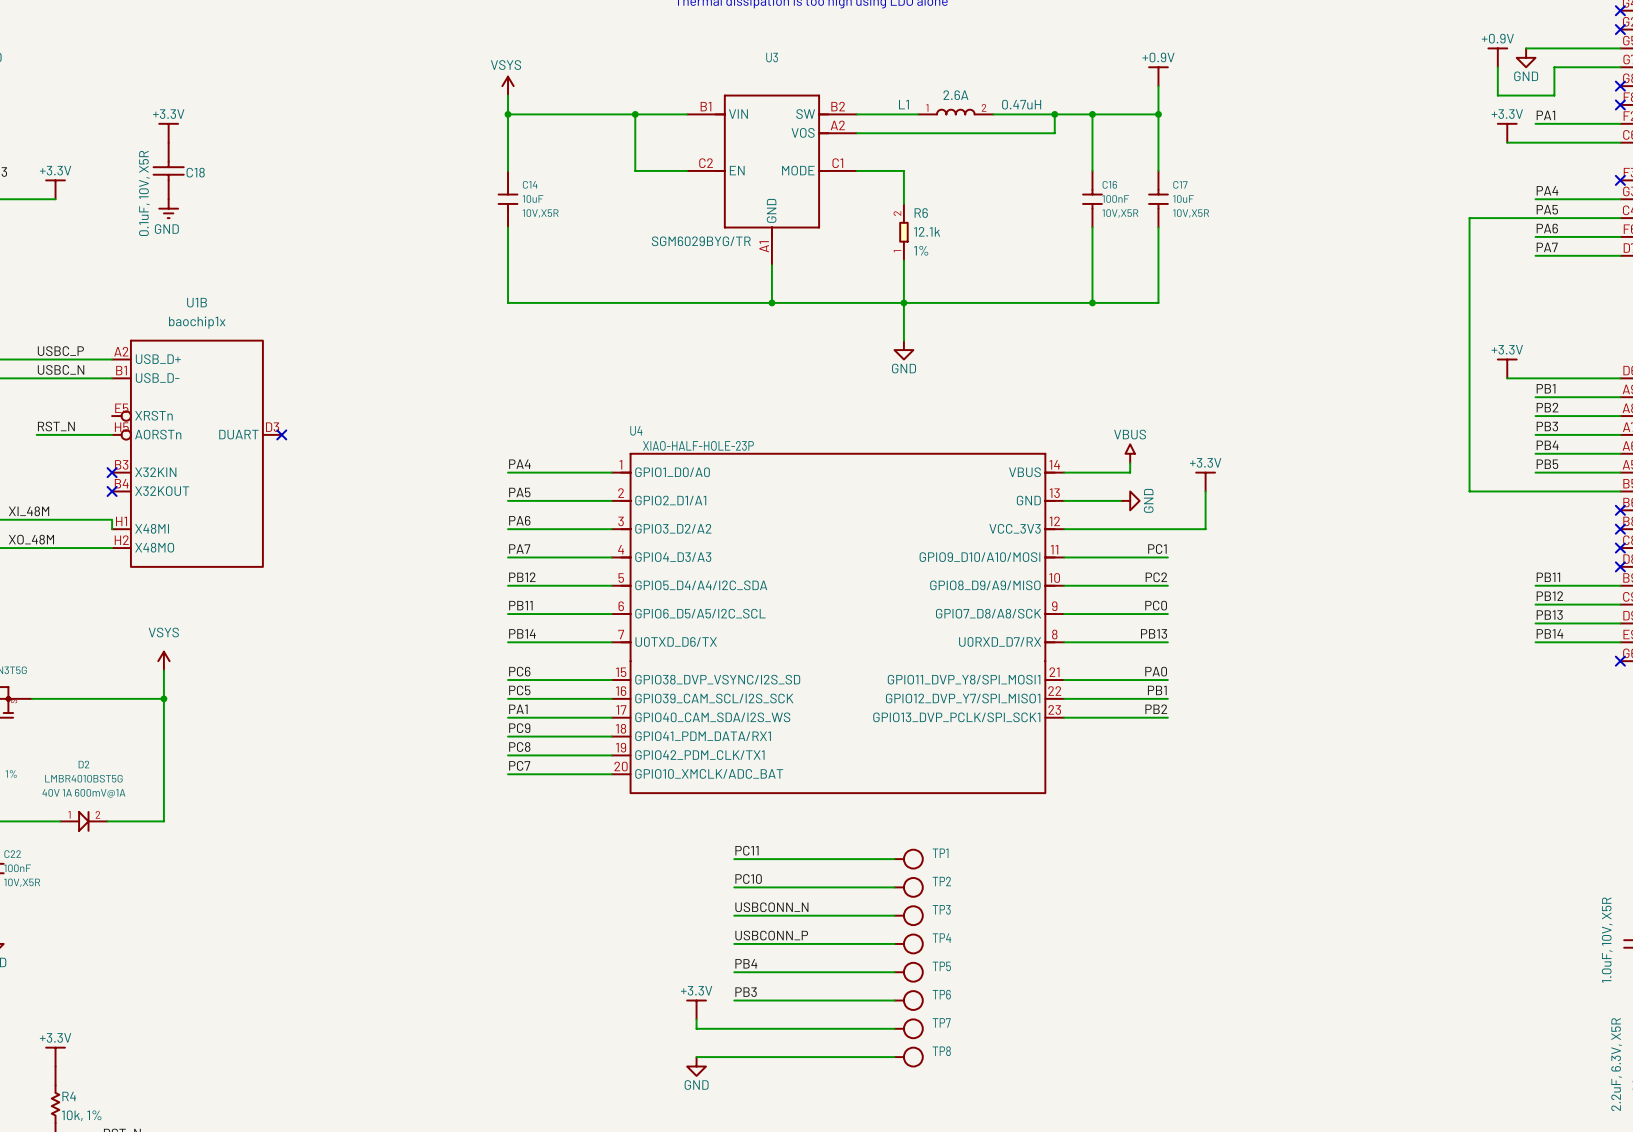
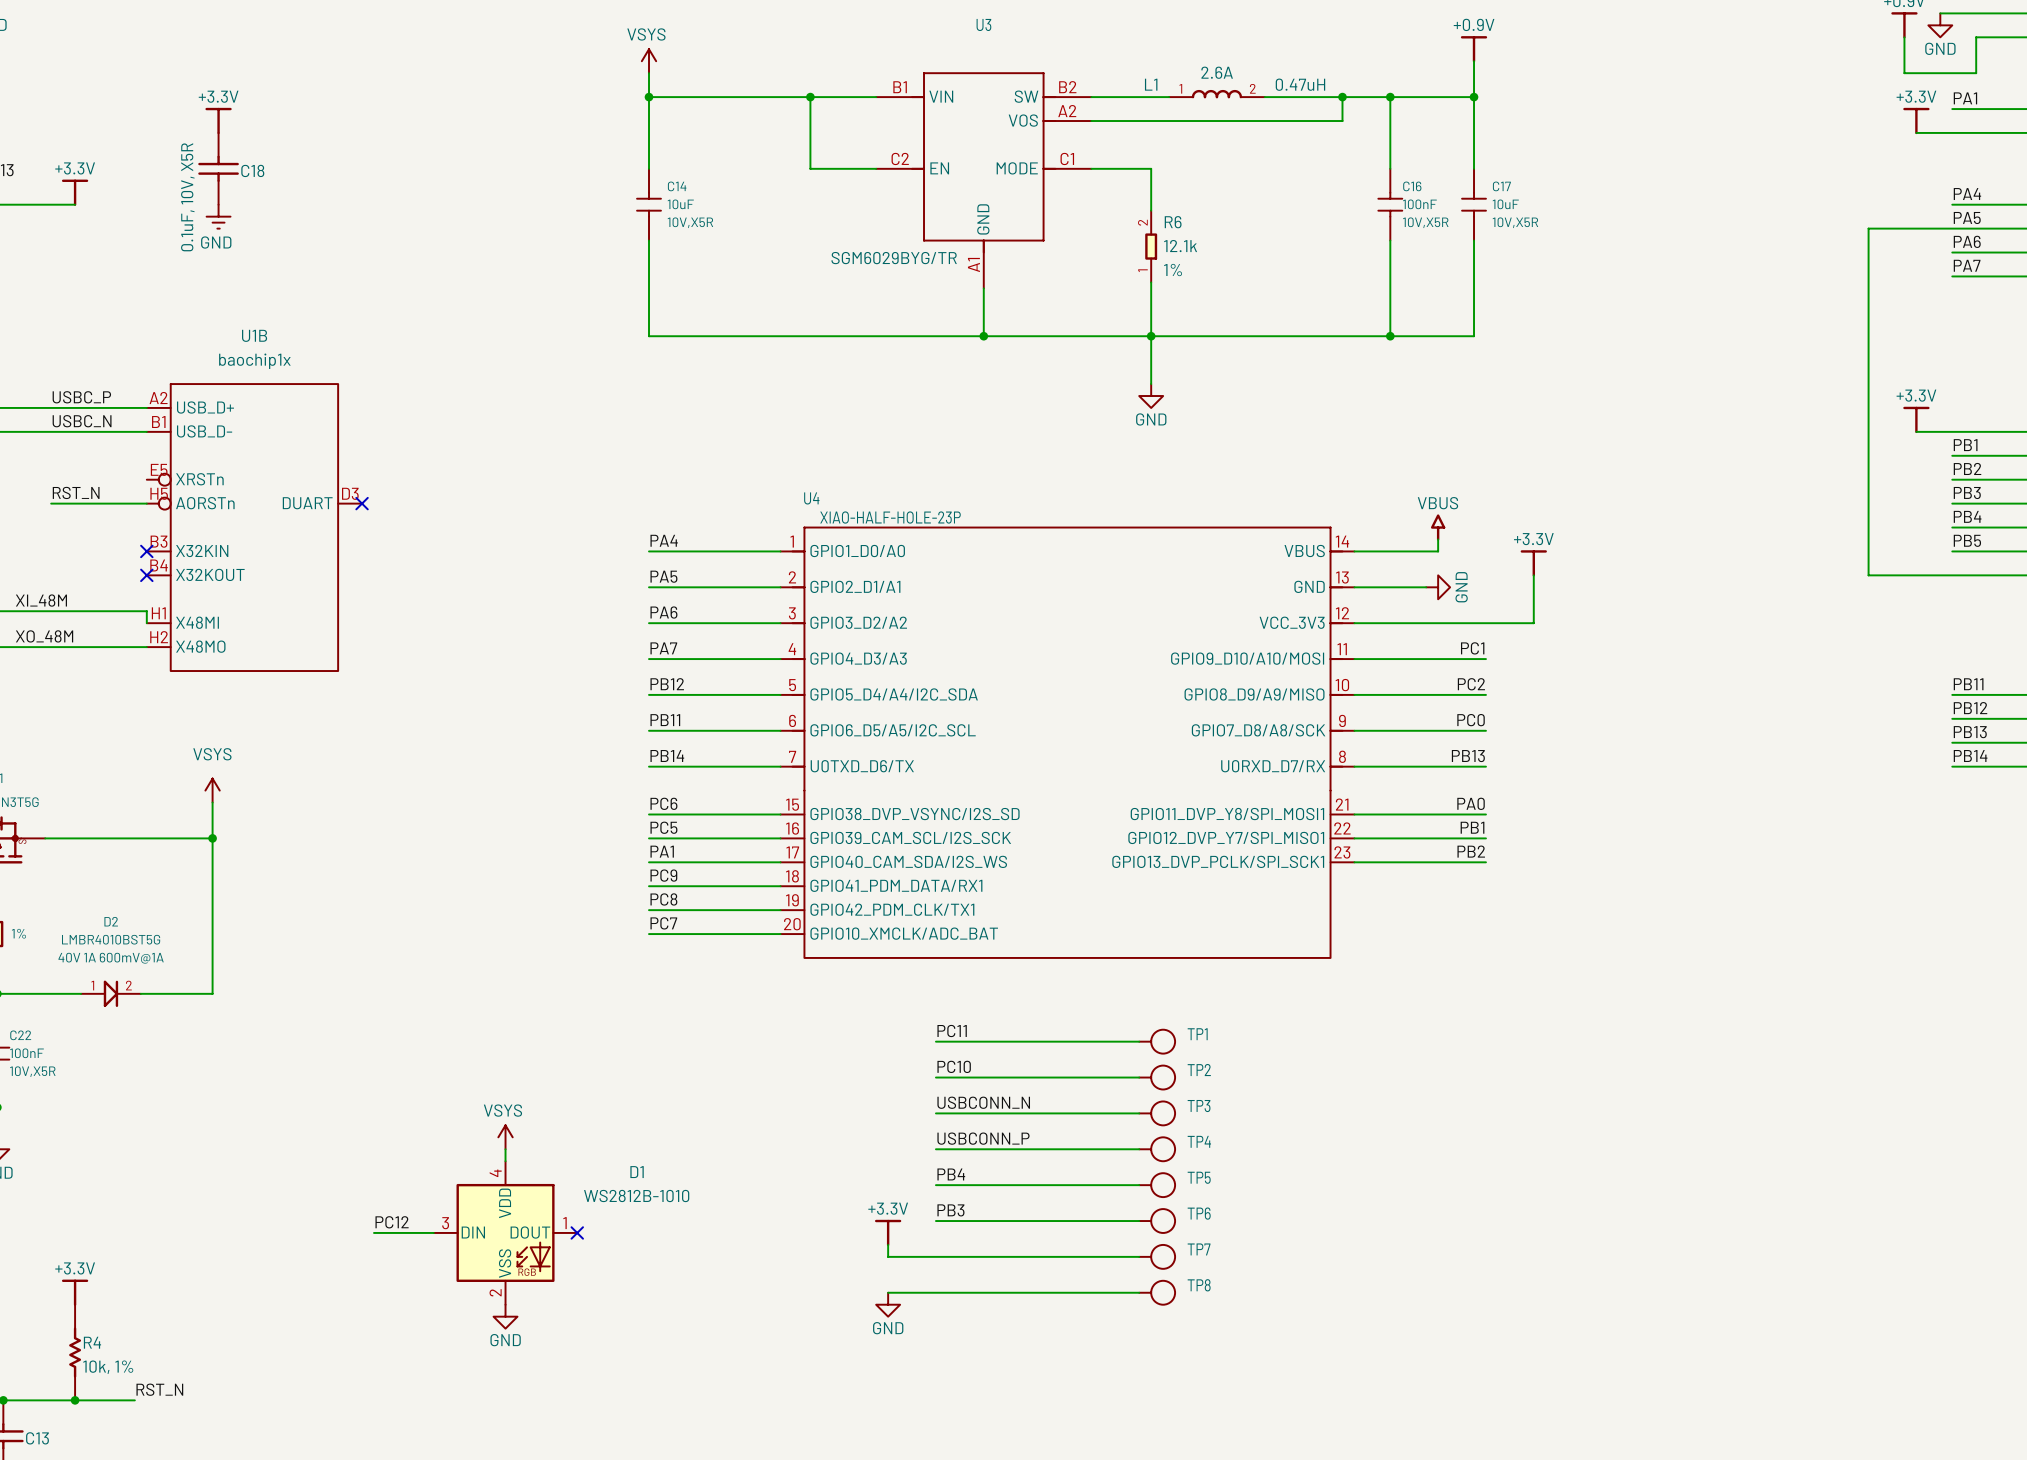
power symbol: none -> VSYS (505, 1137)
wire: none -> (505, 1149) (505, 1161)
label: none -> PC12 (392, 1222)
wire: none -> (374, 1232) (433, 1232)
D1: none -> WS2812B-1010 (505, 1232)
no-connect mark: none -> (577, 1232)
power symbol: none -> GND (505, 1316)

